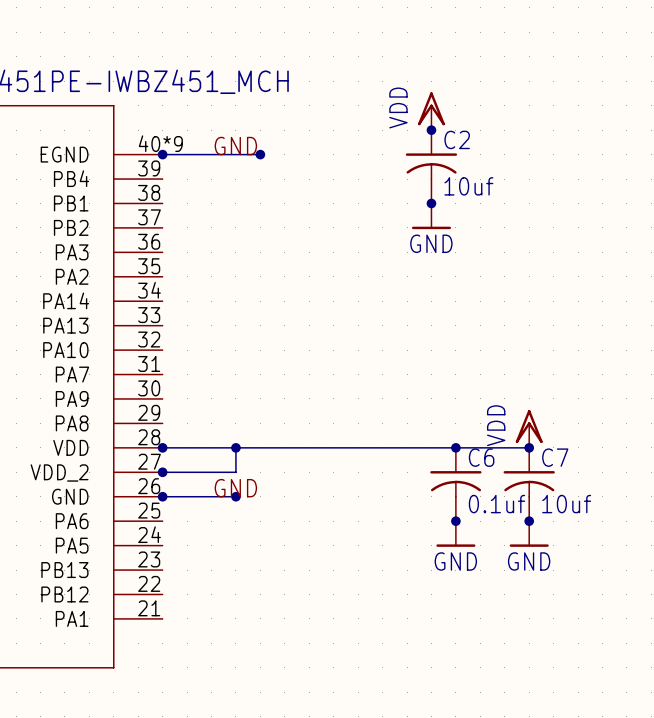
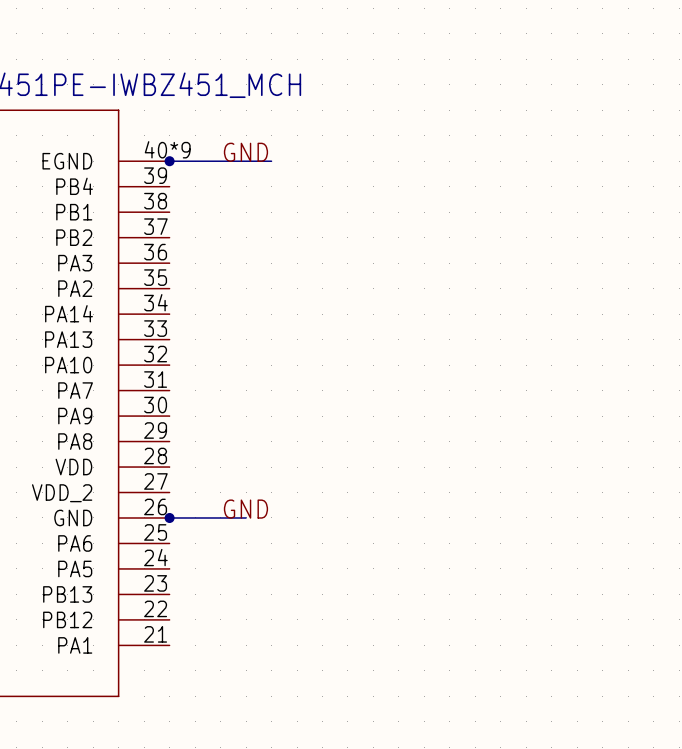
power symbol: VDD (431, 111) -> none
junction: (431, 130) -> none
junction: (260, 154) -> none
C2: 10uf (431, 166) -> none
junction: (431, 203) -> none
power symbol: GND (431, 216) -> none
power symbol: VDD (529, 428) -> none
wire: (162, 447) (529, 447) -> none
junction: (162, 447) -> none
wire: (235, 447) (235, 472) (162, 472) -> none
junction: (235, 447) -> none
junction: (455, 447) -> none
junction: (529, 447) -> none
junction: (162, 472) -> none
C6: 0.1uf (455, 484) -> none
C7: 10uf (529, 484) -> none
junction: (235, 496) -> none
junction: (455, 521) -> none
junction: (529, 521) -> none
power symbol: GND (455, 534) -> none
power symbol: GND (529, 534) -> none

